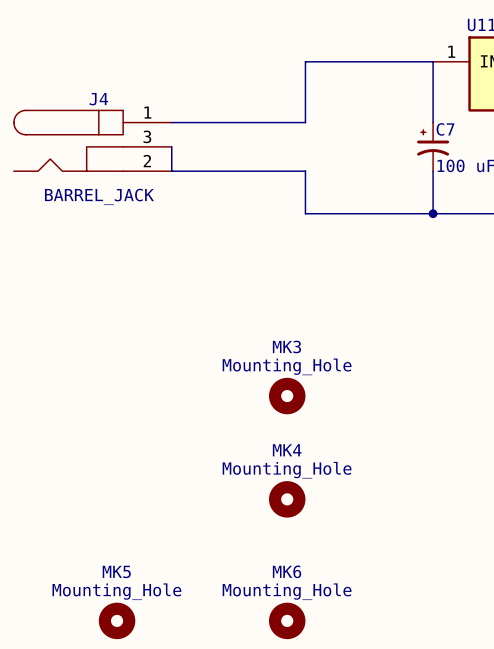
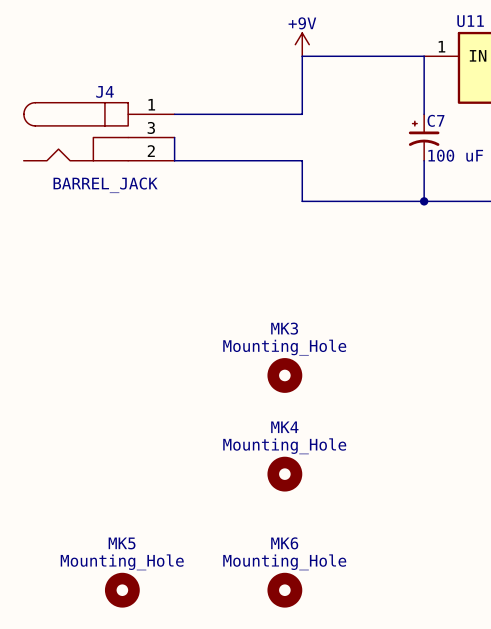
power symbol: none -> +9V (302, 44)

